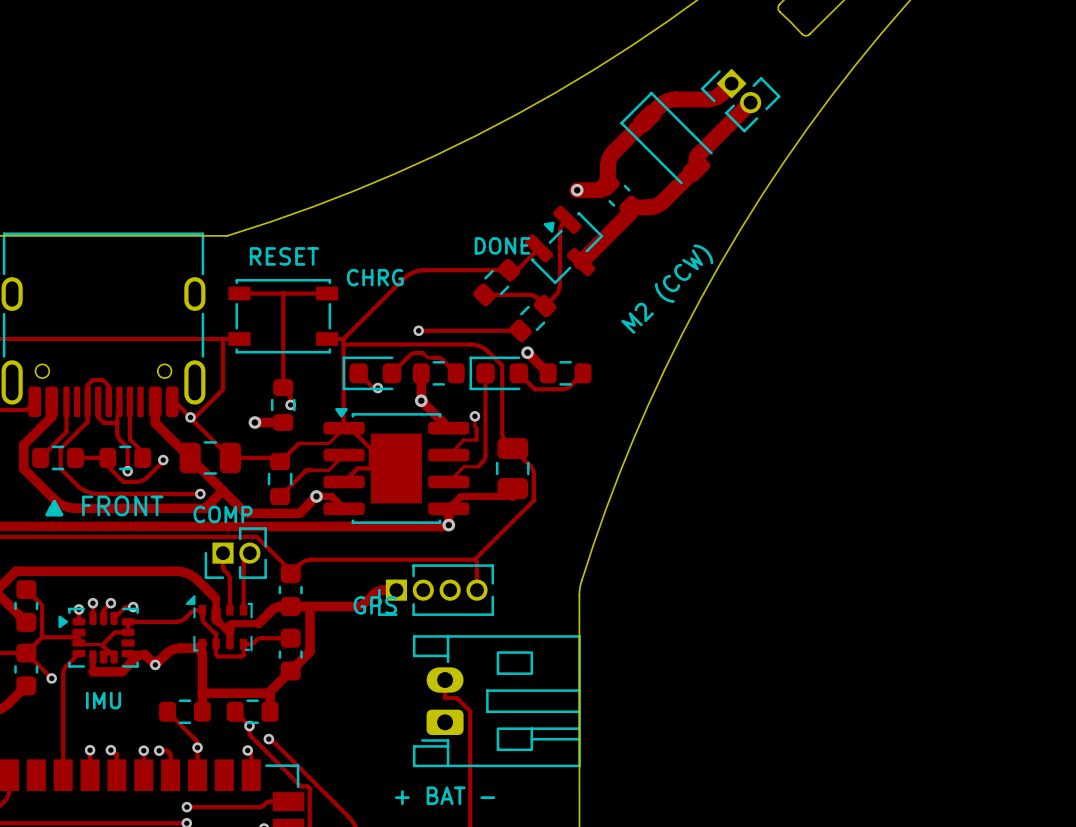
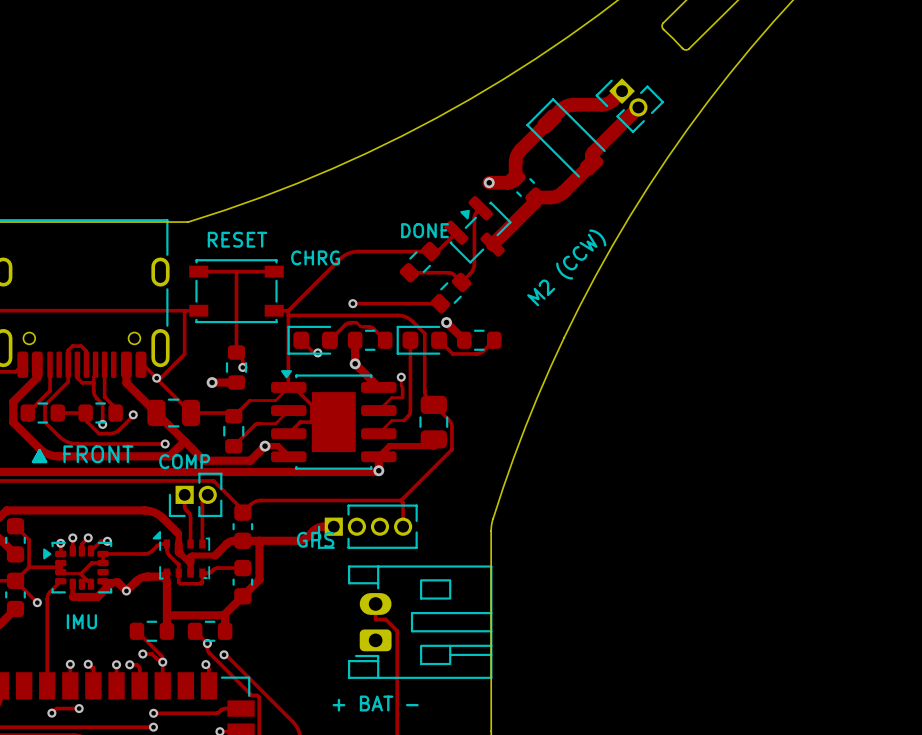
track: none -> (142, 654) (151, 654) (162, 662)
via: none -> (142, 654)
track: none -> (79, 708) (56, 708) (51, 713)
via: none -> (79, 708)
via: none -> (51, 713)

